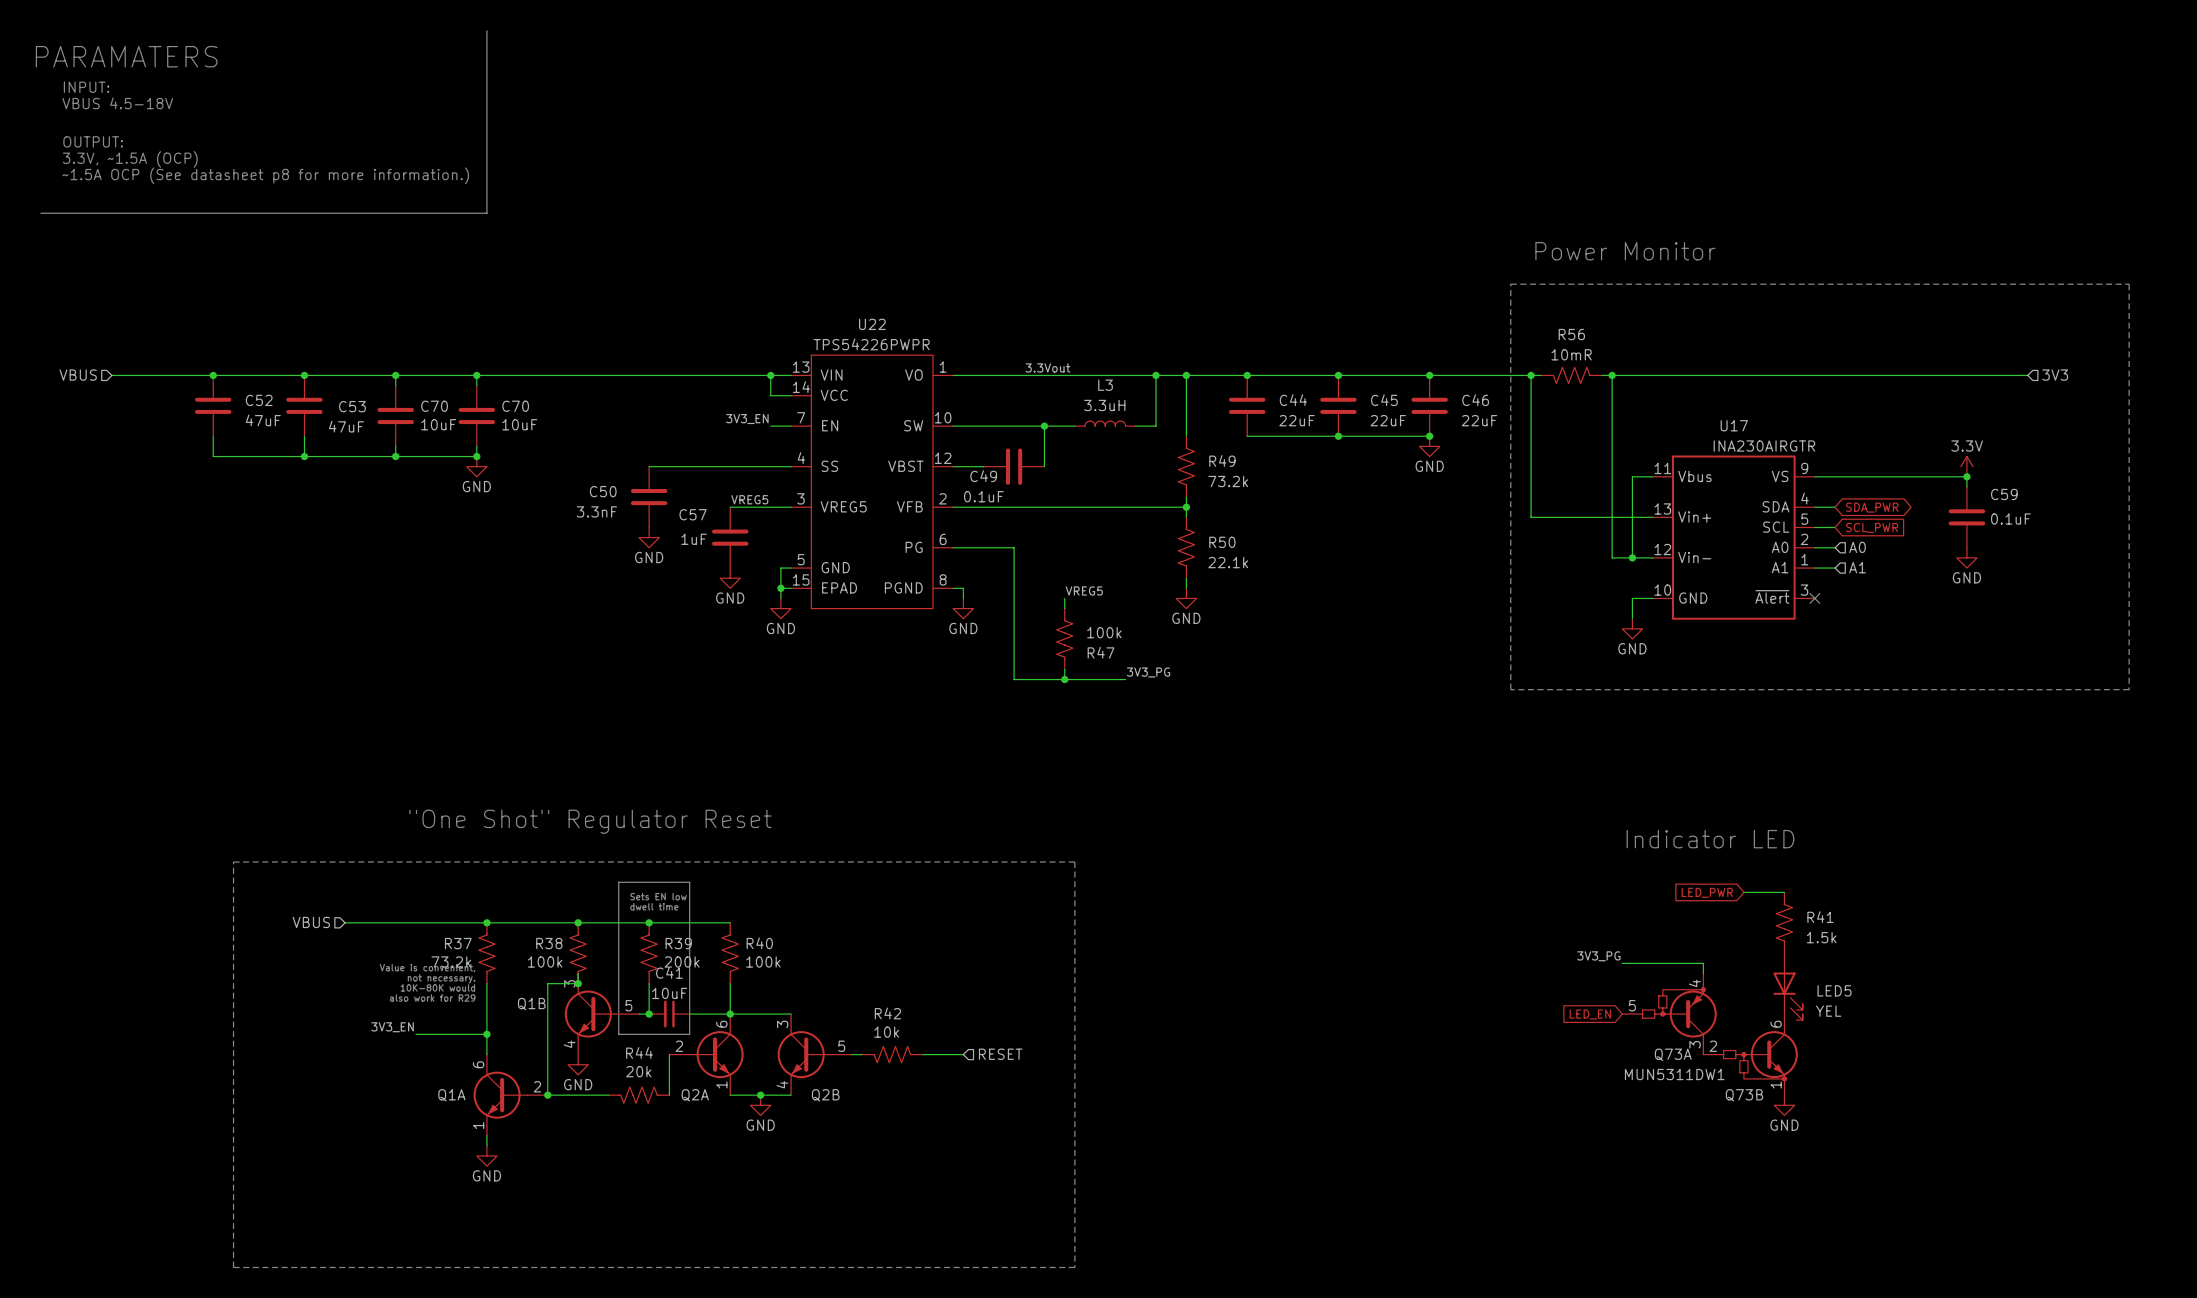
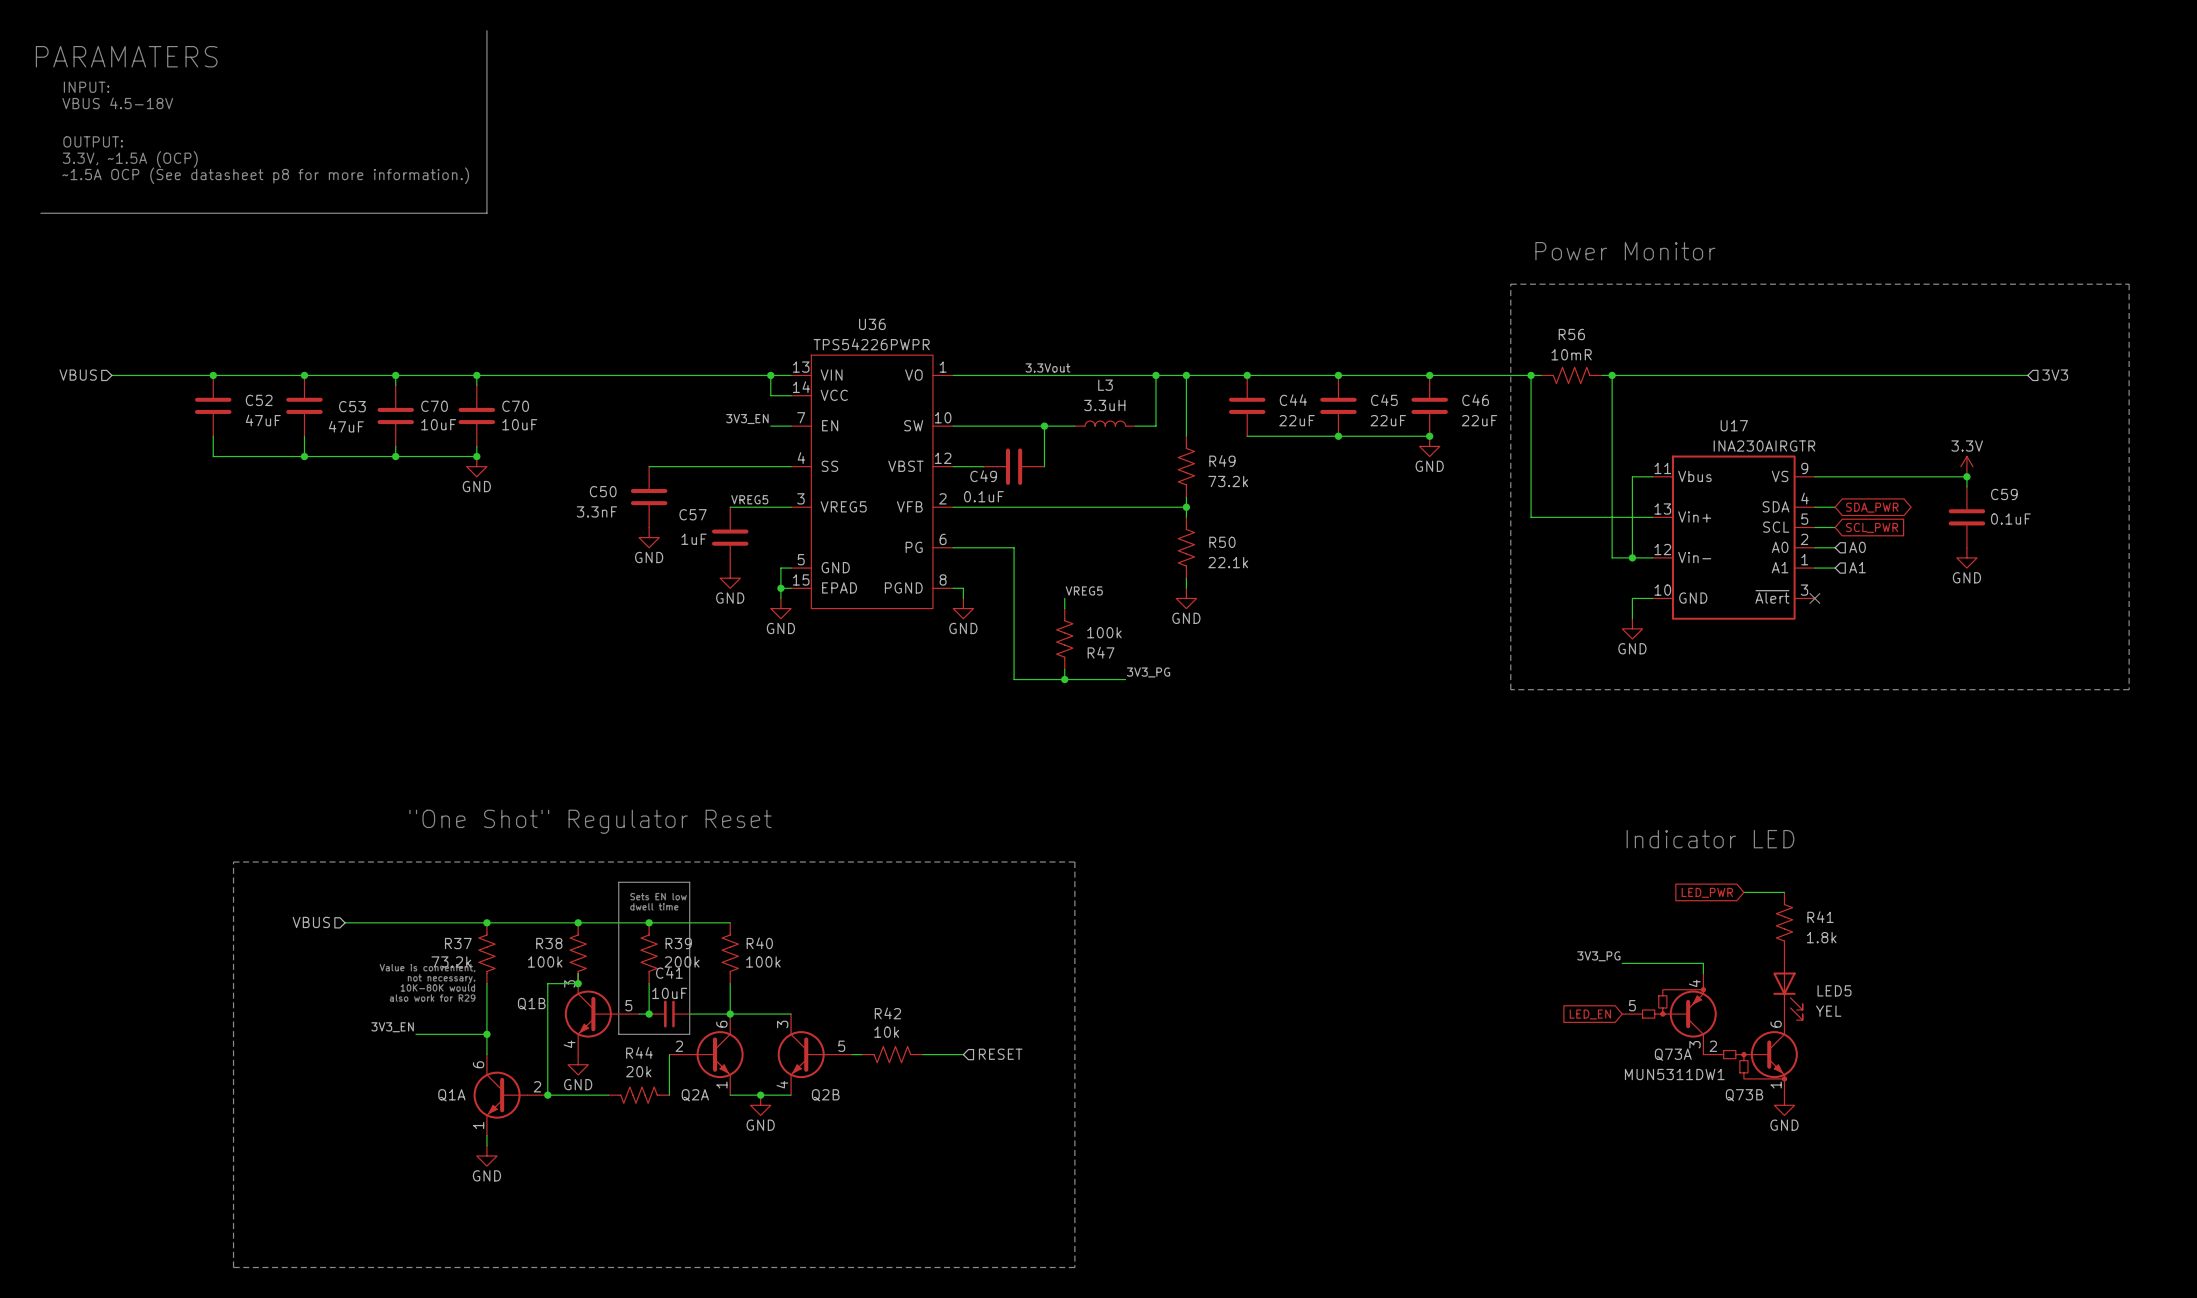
U22 name: U22 (872, 324) -> U36 (872, 324)
R41 value: 1.5k (1821, 937) -> 1.8k (1821, 937)

